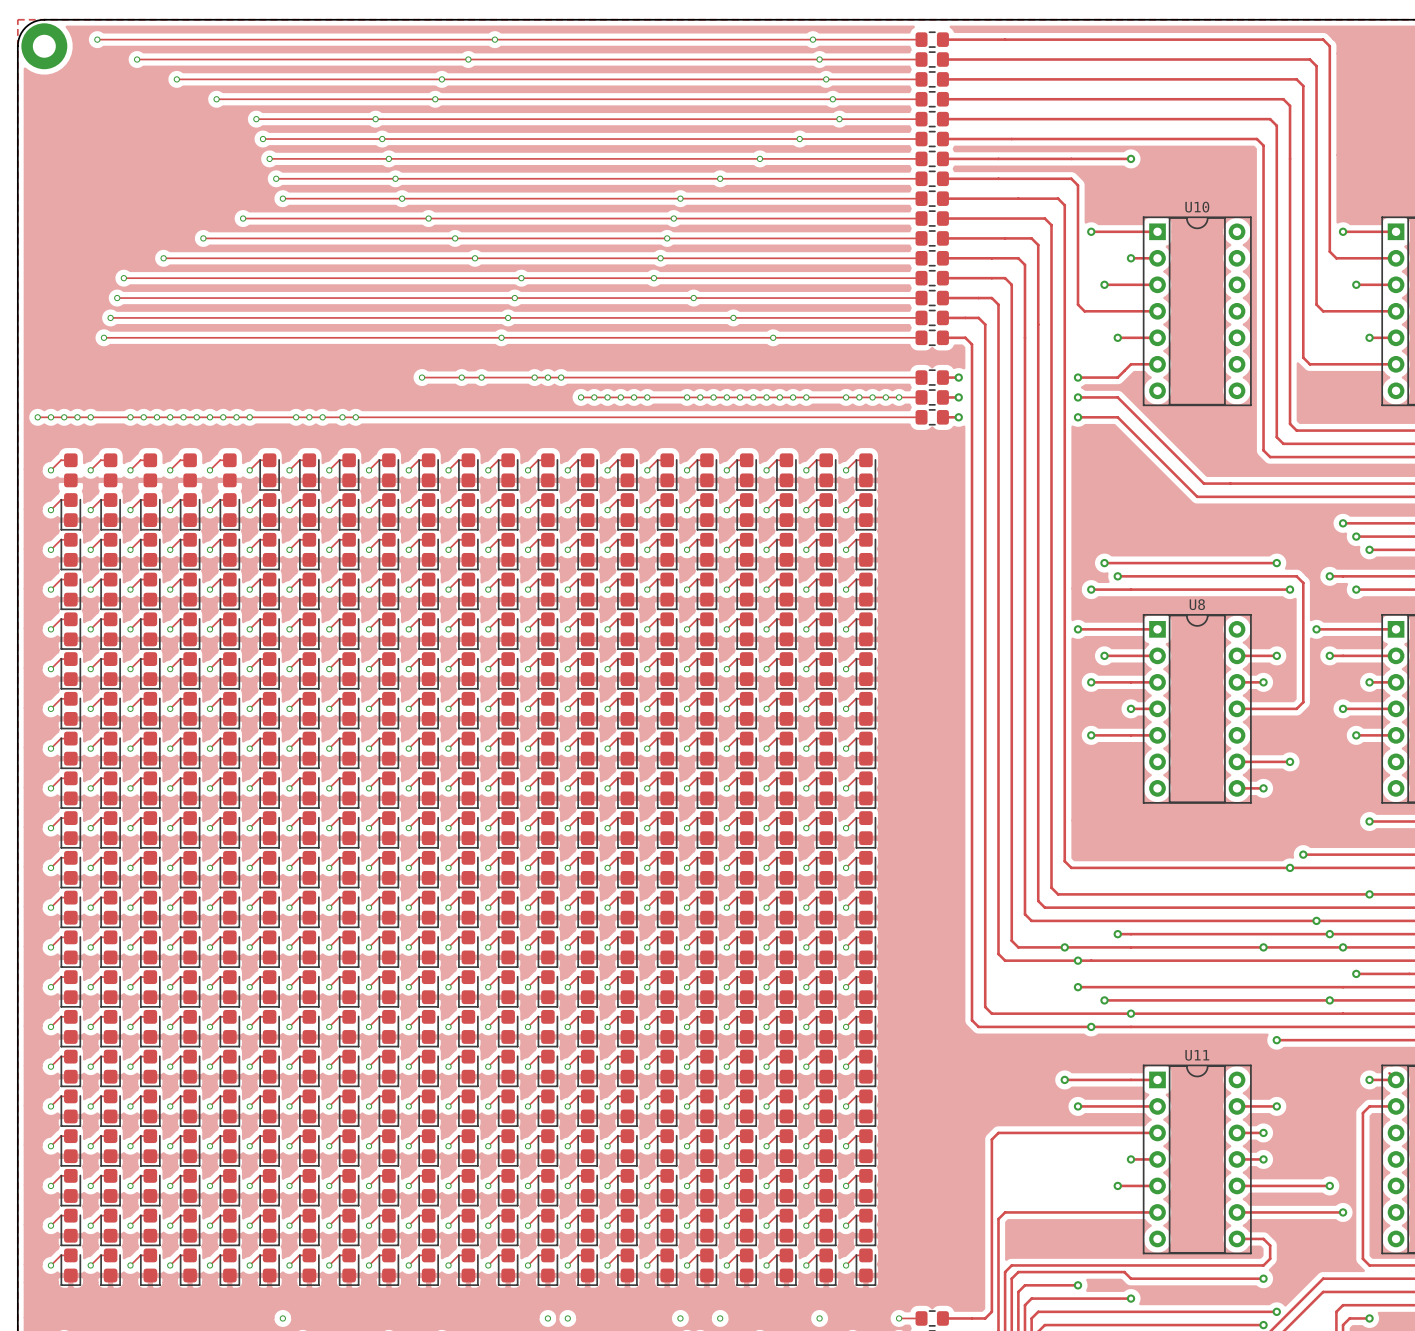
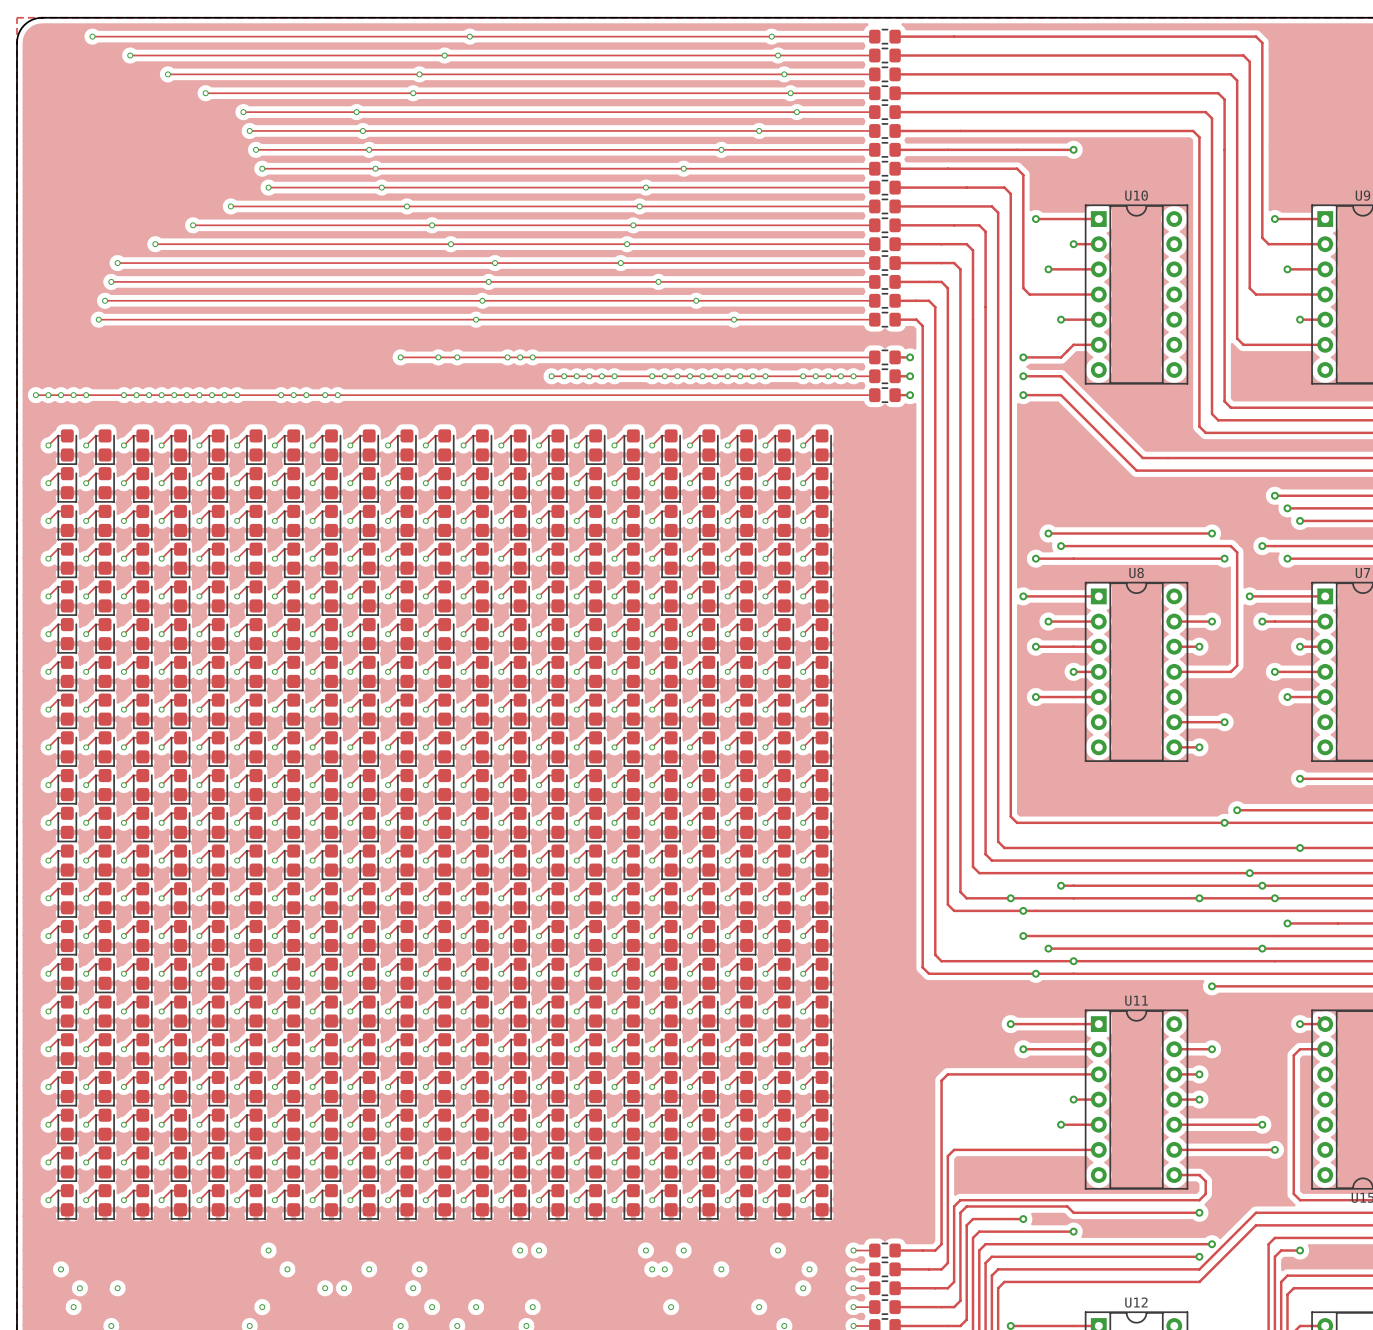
part: (44, 46) -> none
part footprint: [64, 453, 78, 488] -> [57, 429, 77, 465]
part footprint: [103, 453, 118, 488] -> [95, 429, 115, 465]
part footprint: [143, 453, 158, 488] -> [133, 429, 153, 465]
part footprint: [183, 453, 197, 488] -> [170, 429, 191, 465]
part footprint: [223, 453, 237, 488] -> [208, 429, 228, 465]

